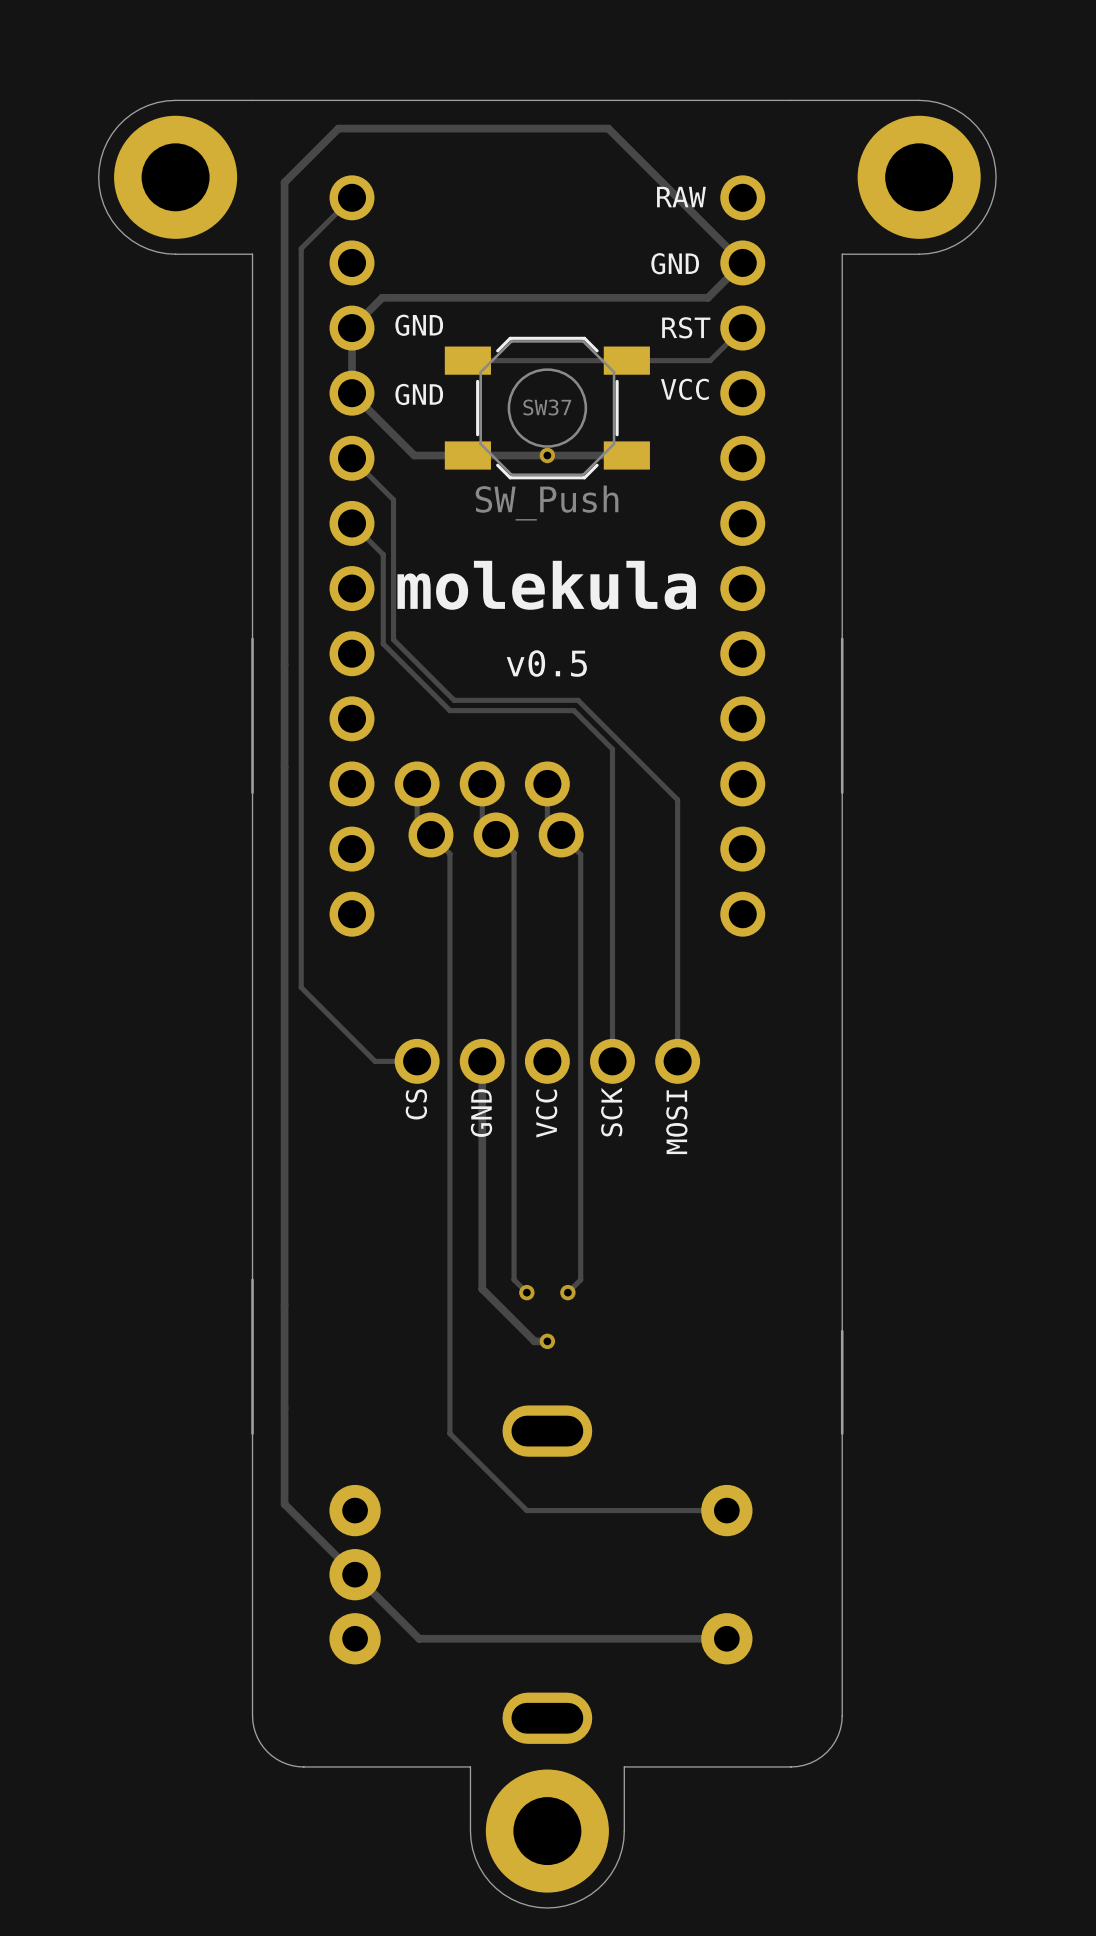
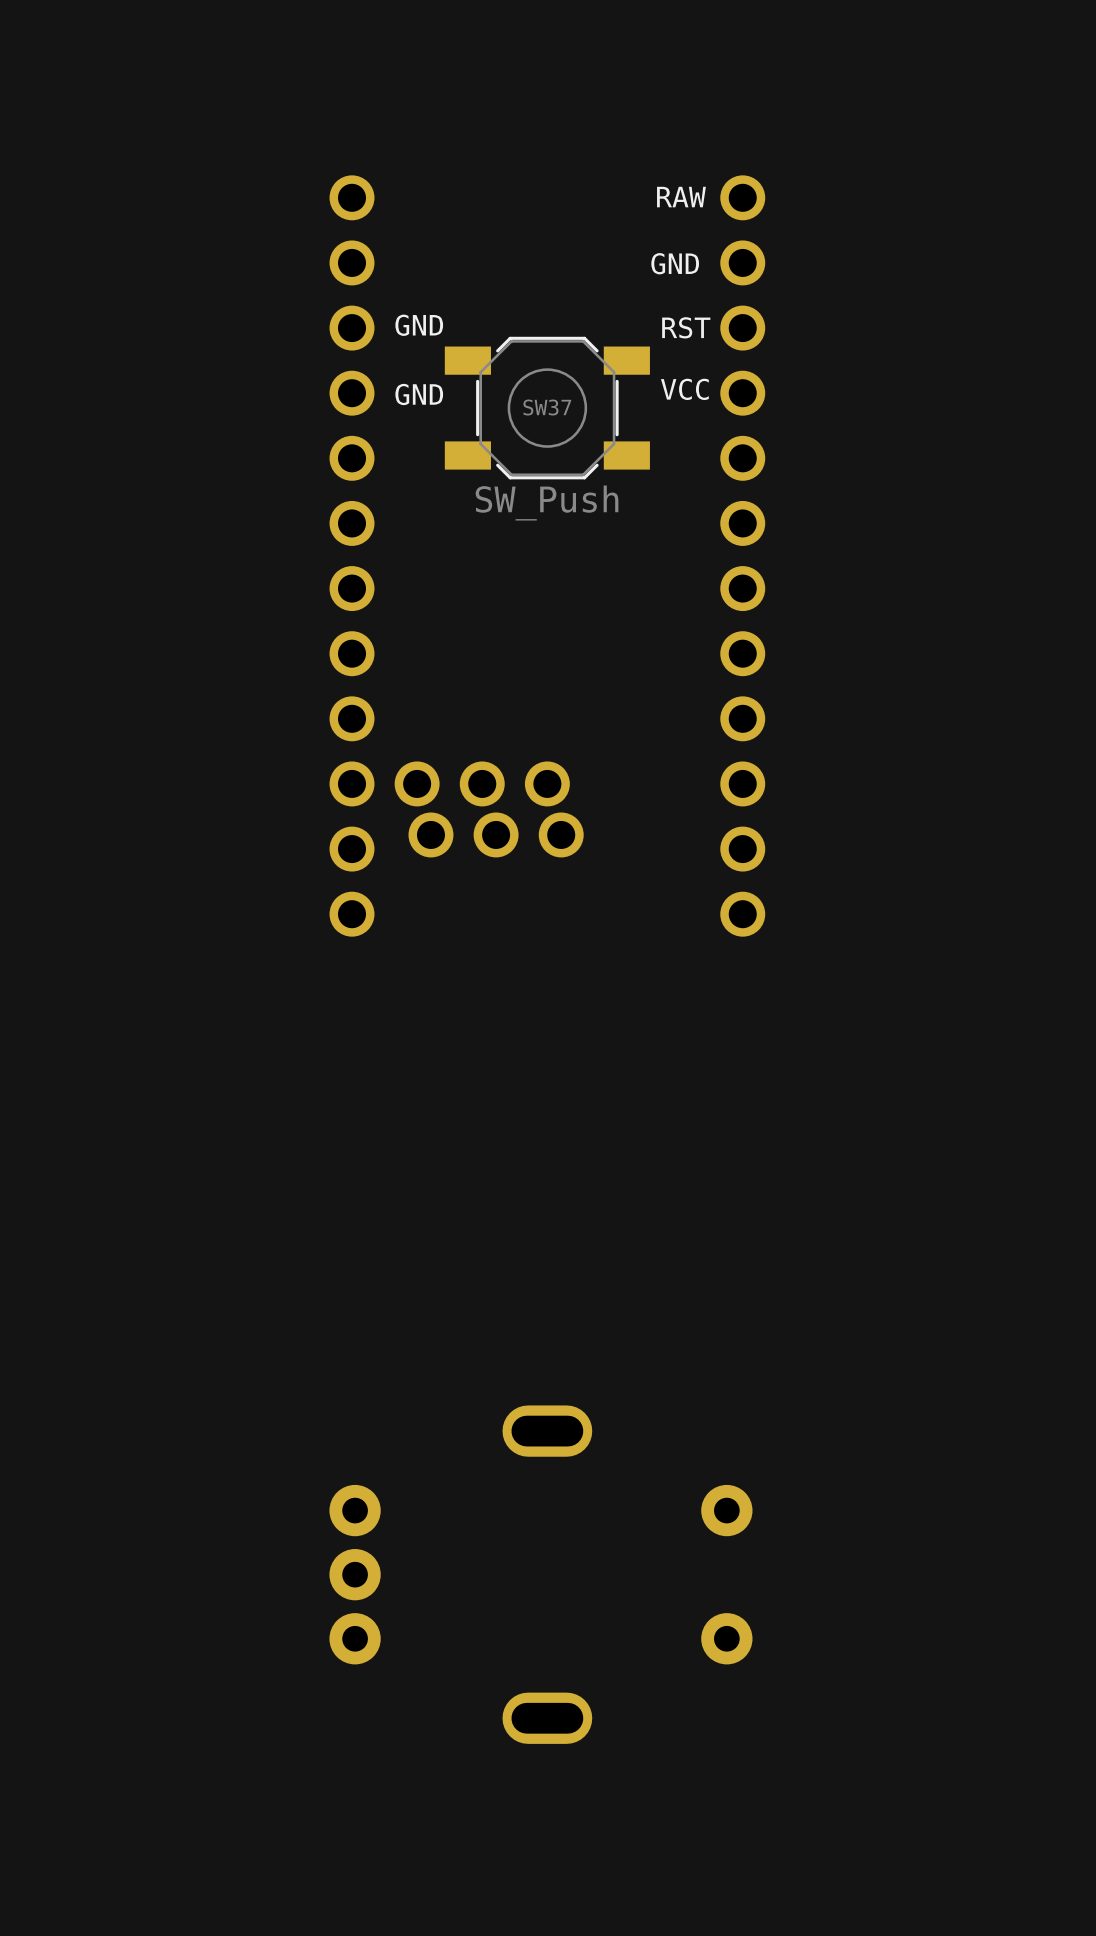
board edge: (175, 100) (928, 100) (954, 109) (970, 119) (982, 133) (993, 158) (995, 186) (991, 204) (982, 221) (962, 240) (946, 249) (928, 253) (842, 254) (842, 1715) (840, 1728) (835, 1741) (827, 1751) (810, 1763) (797, 1766) (624, 1766) (624, 1831) (619, 1858) (610, 1874) (598, 1888) (583, 1899) (565, 1905) (547, 1907) (520, 1902) (496, 1888) (484, 1874) (475, 1858) (471, 1840) (470, 1766) (292, 1765) (276, 1759) (267, 1751) (260, 1742) (253, 1727) (252, 254) (166, 253) (139, 245) (124, 234) (107, 213) (100, 195) (98, 177) (100, 158) (107, 141) (124, 119) (148, 105) (175, 100) -> none
part: (175, 177) -> none
part: (919, 177) -> none
track: (352, 197) (301, 248) (301, 987) (375, 1061) (417, 1061) -> none
track: (742, 328) (710, 360) (467, 360) -> none
via: (547, 455) -> none
track: (626, 455) (414, 455) (352, 393) (352, 328) (382, 297) (707, 297) (742, 262) (608, 128) (338, 128) (284, 182) (284, 1504) (419, 1638) (726, 1638) -> none
track: (352, 458) (393, 499) (393, 639) (454, 700) (578, 700) (677, 799) (677, 1061) -> none
track: (352, 523) (383, 554) (383, 643) (449, 710) (573, 710) (612, 749) (612, 1061) -> none
text: molekula (546, 585) -> none
text: v0.5 (546, 663) -> none
track: (417, 783) (417, 821) (449, 853) (449, 1433) (526, 1510) (726, 1510) -> none
track: (482, 783) (482, 821) (514, 852) (514, 1279) (526, 1292) -> none
track: (547, 783) (547, 821) (580, 854) (580, 1279) (567, 1292) -> none
track: (482, 1061) (482, 1289) (534, 1341) (547, 1341) -> none
part: (547, 1061) -> none
via: (526, 1292) -> none
via: (567, 1292) -> none
via: (547, 1341) -> none
part: (547, 1831) -> none

